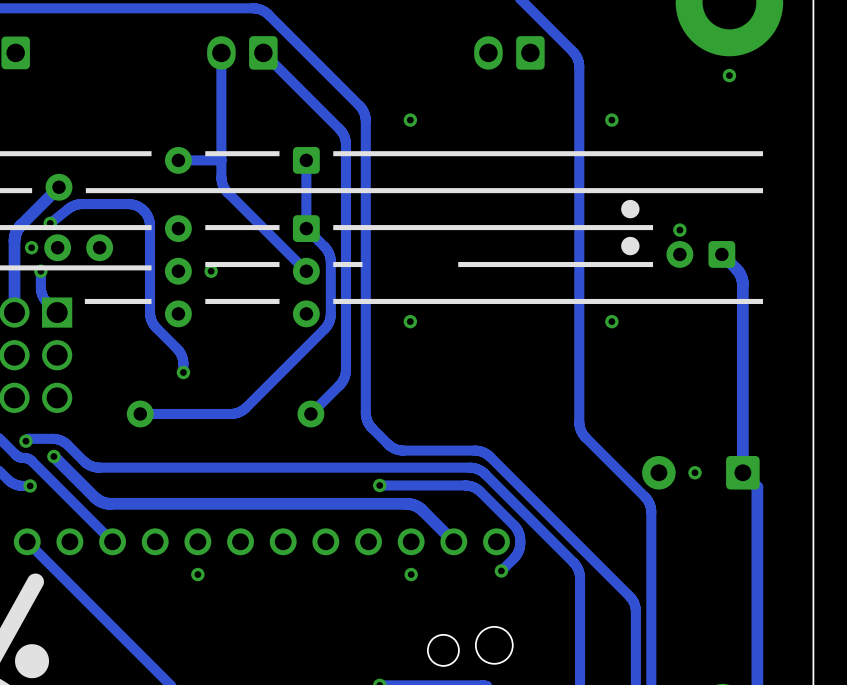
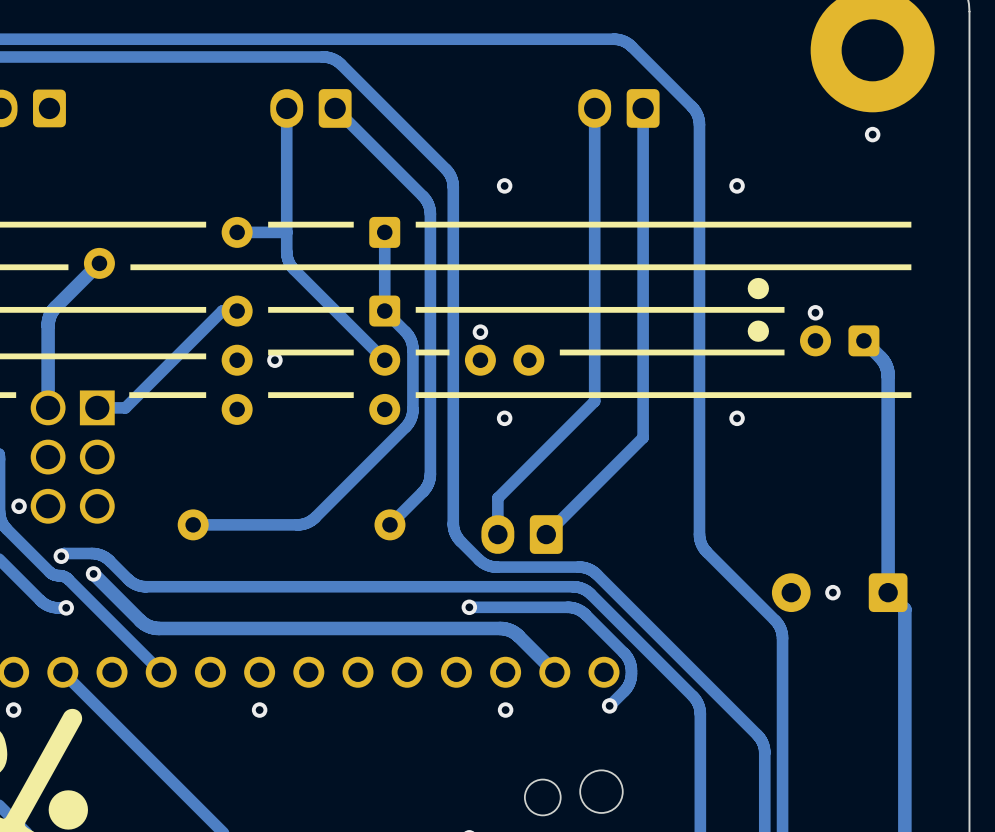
track: none -> (594, 108) (594, 401) (497, 498) (497, 534)
track: none -> (643, 108) (643, 437) (546, 534)
track: (50, 223) (70, 207) (79, 204) (130, 204) (144, 211) (149, 223) (150, 316) (154, 326) (180, 353) (183, 372) -> none
via: (50, 223) -> none
via: none -> (480, 332)
via: (31, 247) -> none
part position: (78, 247) -> (504, 360)
track: (40, 271) (42, 295) (57, 312) -> (237, 311) (222, 311) (125, 407) (97, 407)
via: (40, 271) -> none
via: (183, 372) -> none
part: none -> (522, 534)

